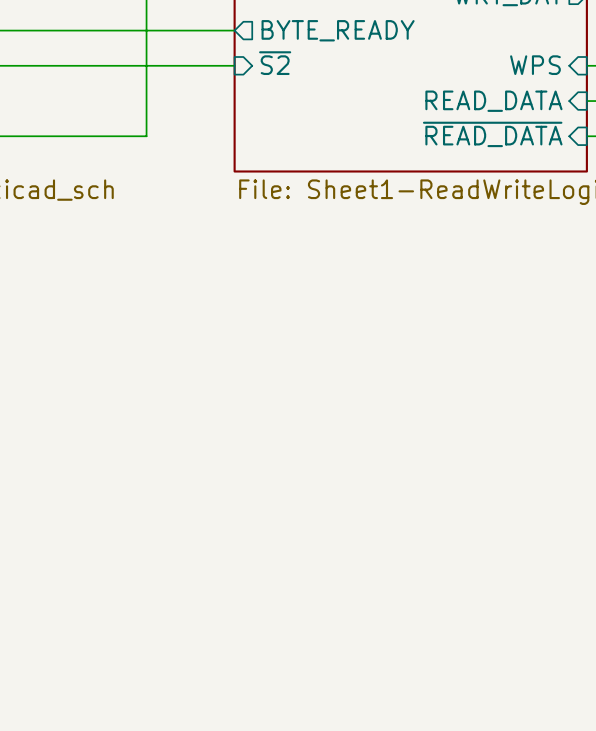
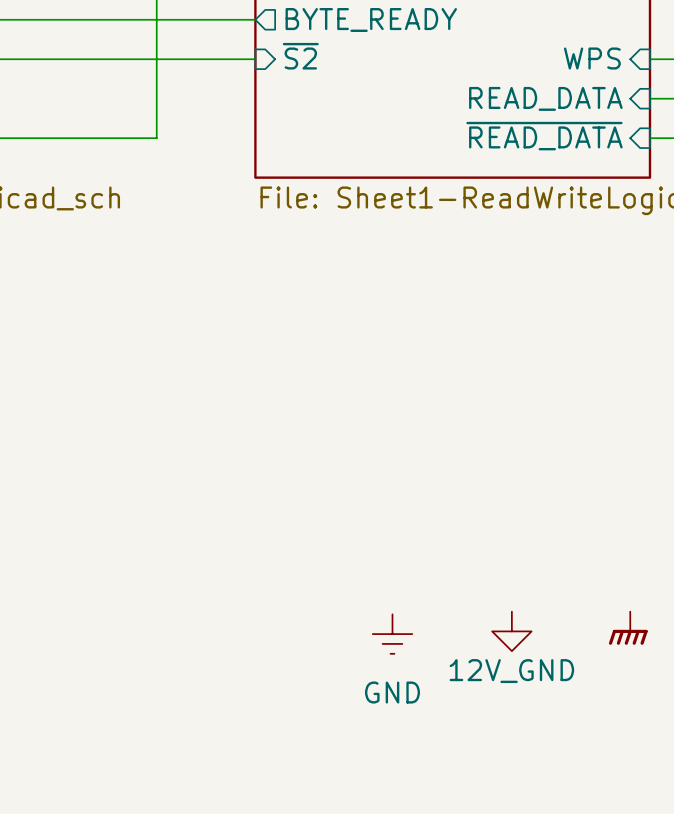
power symbol: none -> (628, 628)
power symbol: none -> 12V_GND (511, 631)
power symbol: none -> GND (392, 634)

